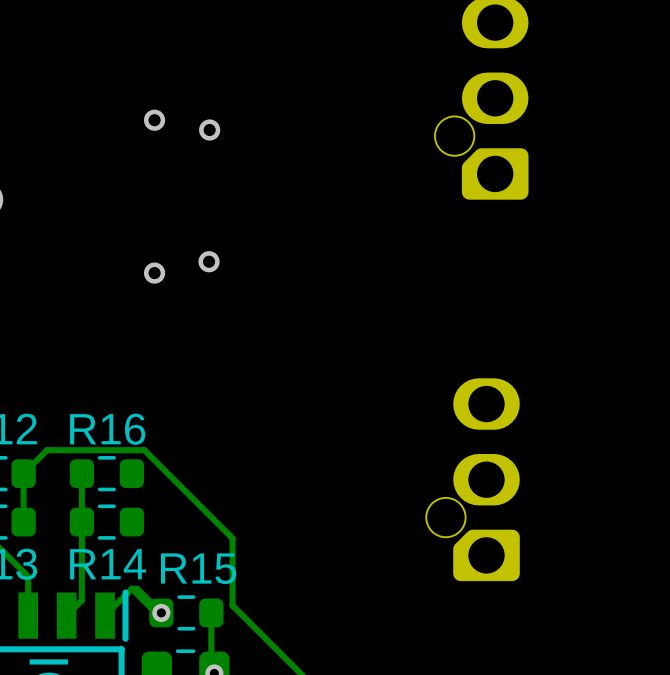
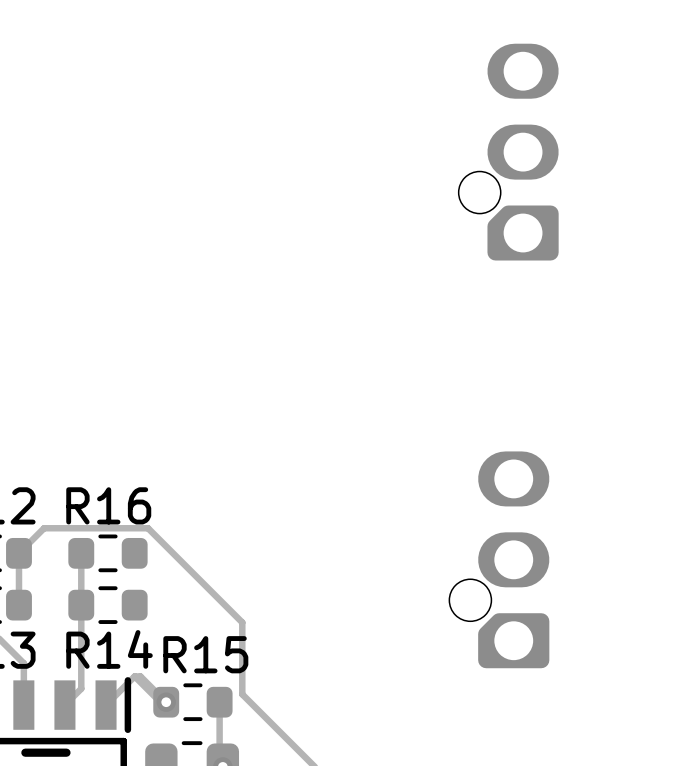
via: (154, 120) -> none
via: (209, 130) -> none
via: (209, 261) -> none
via: (154, 273) -> none

